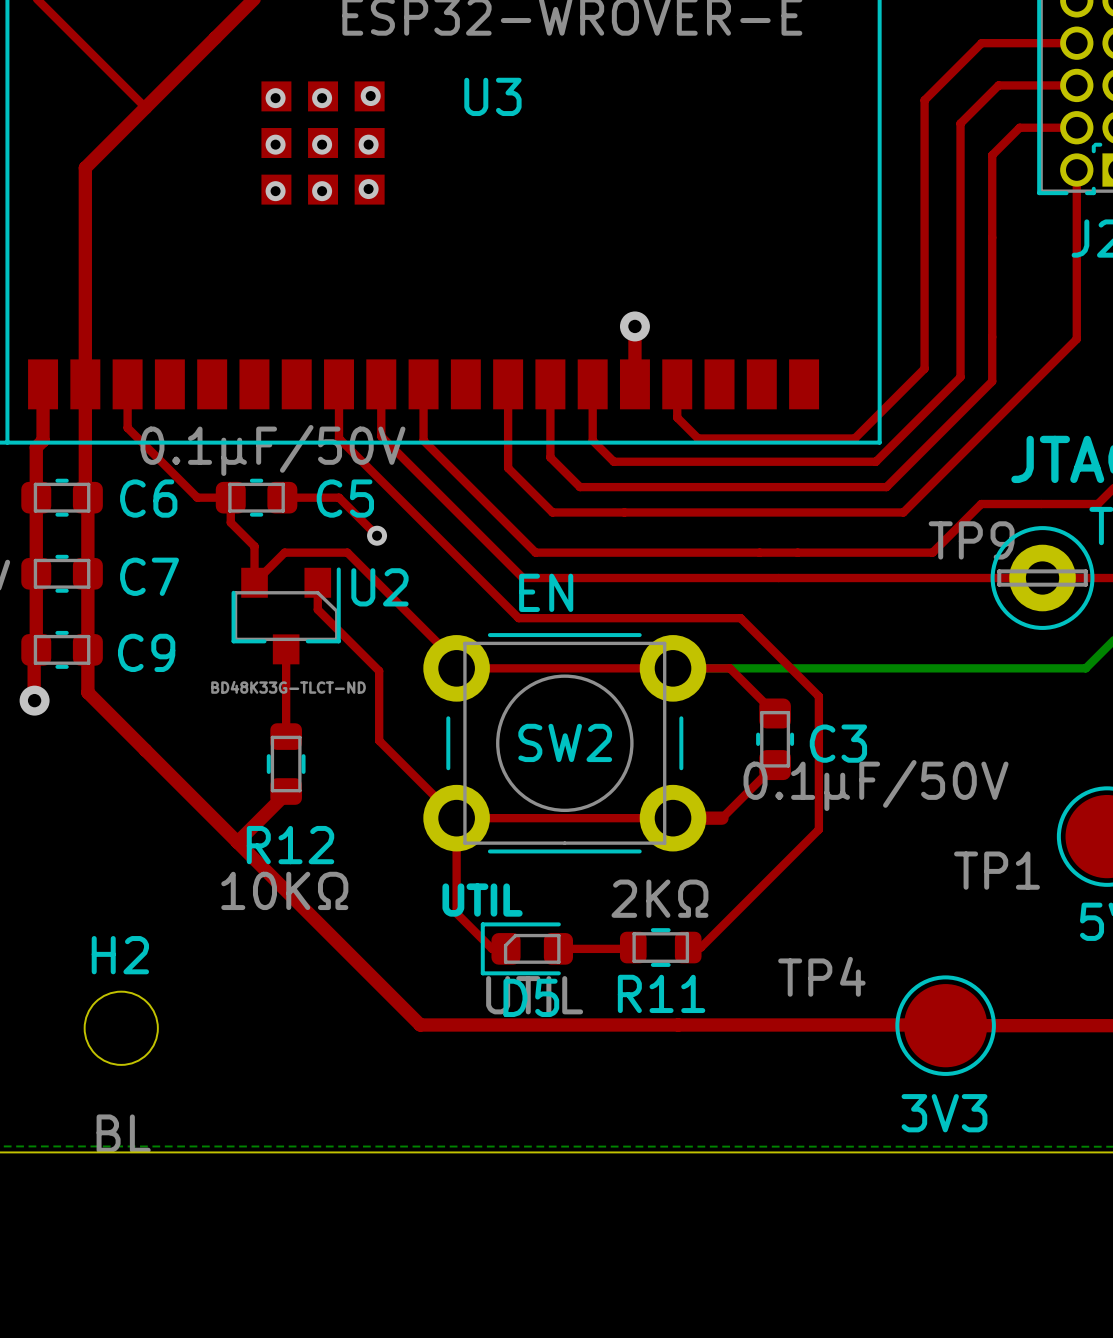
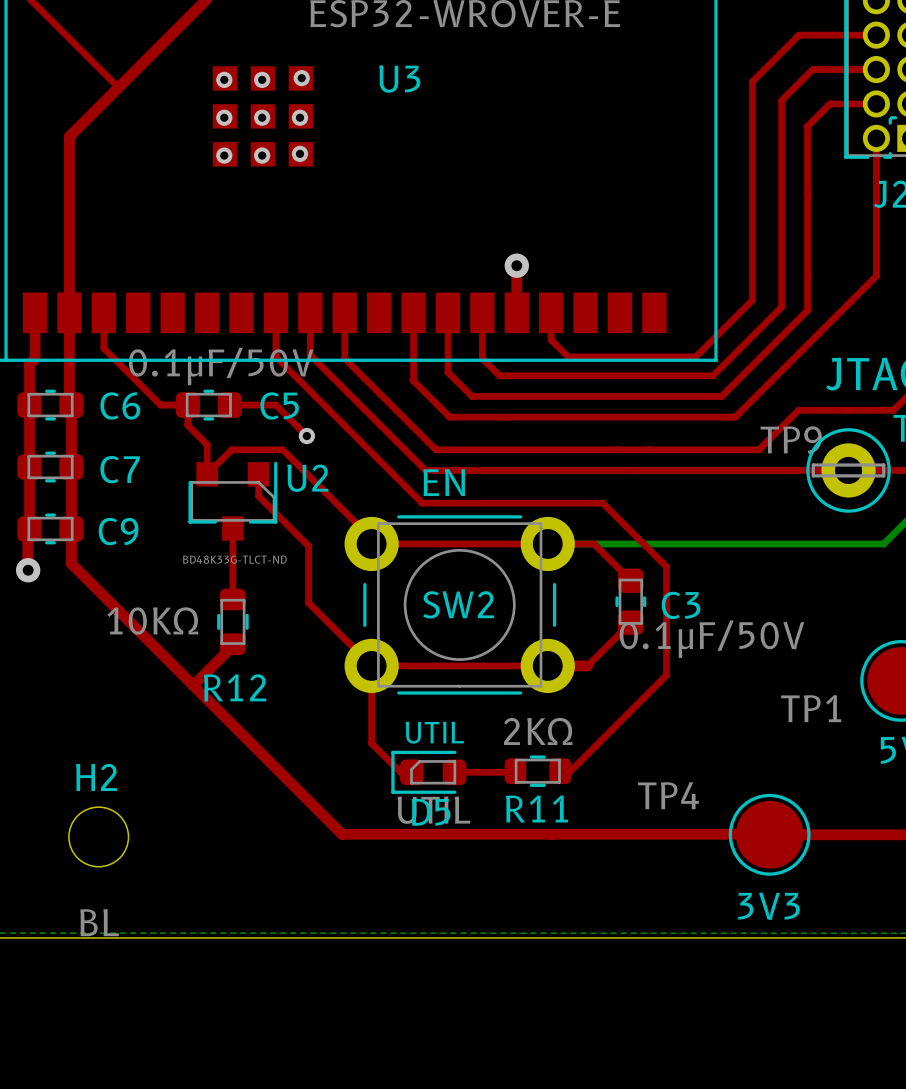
R12 value position: 10KΩ (284, 890) -> 10KΩ (152, 621)
text position: UTIL (482, 900) -> UTIL (434, 732)

